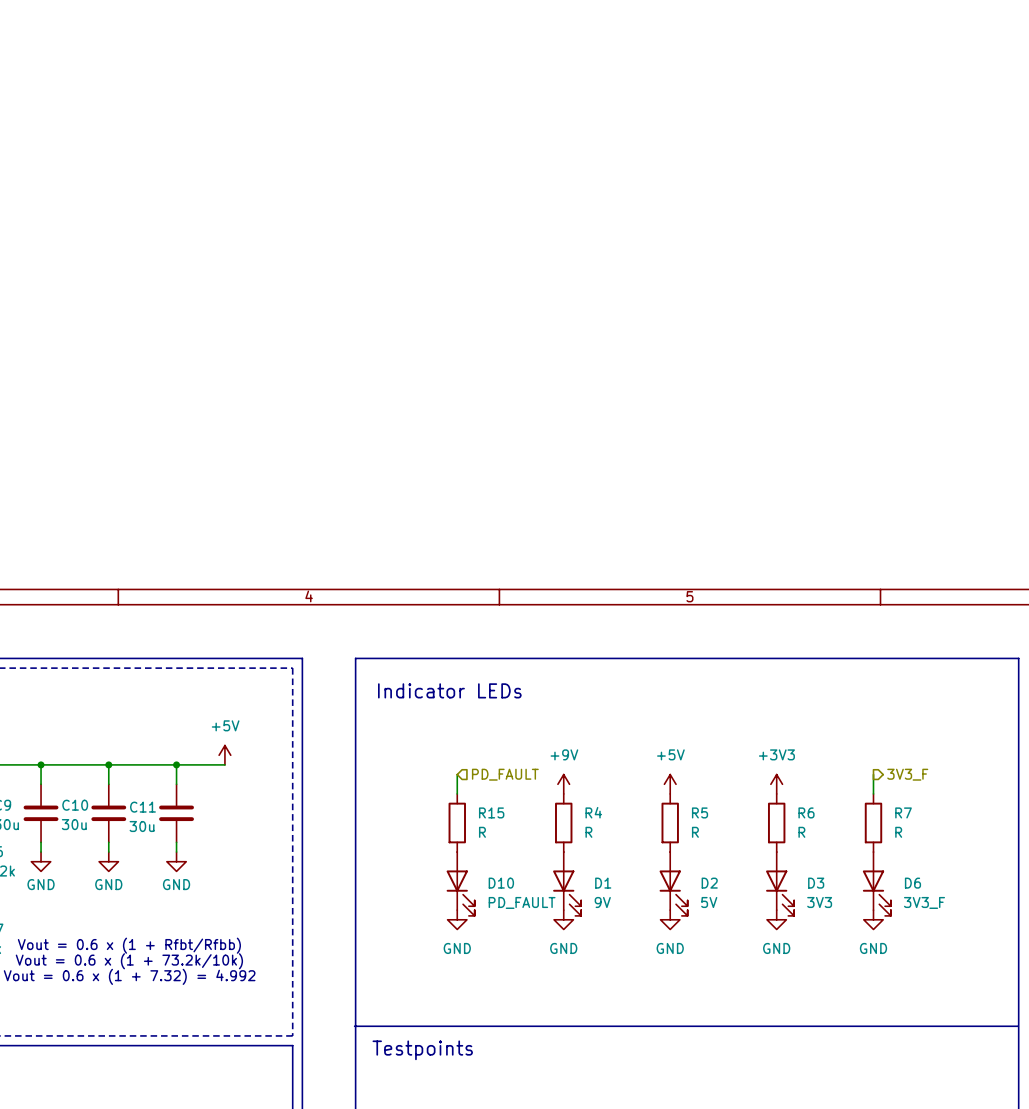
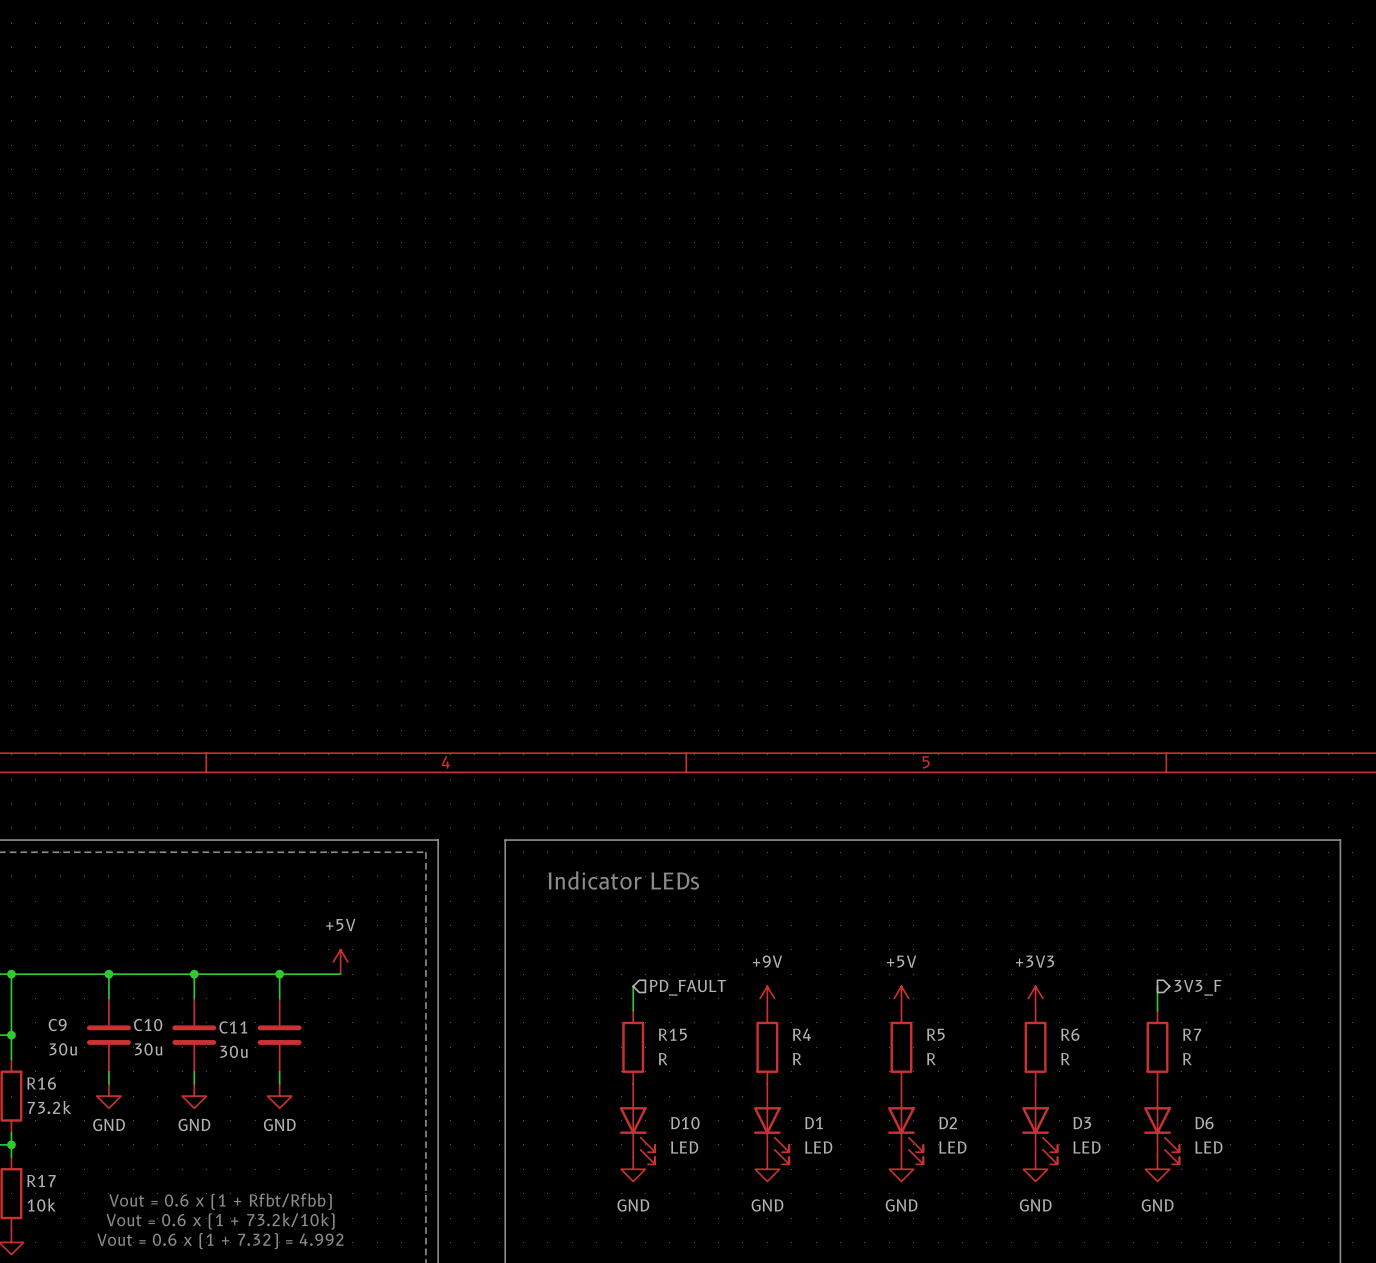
D10 value: PD_FAULT (522, 902) -> LED (684, 1147)
D1 value: 9V (602, 902) -> LED (818, 1147)
D2 value: 5V (709, 902) -> LED (952, 1147)
D3 value: 3V3 (819, 902) -> LED (1087, 1147)
D6 value: 3V3_F (924, 902) -> LED (1208, 1147)

